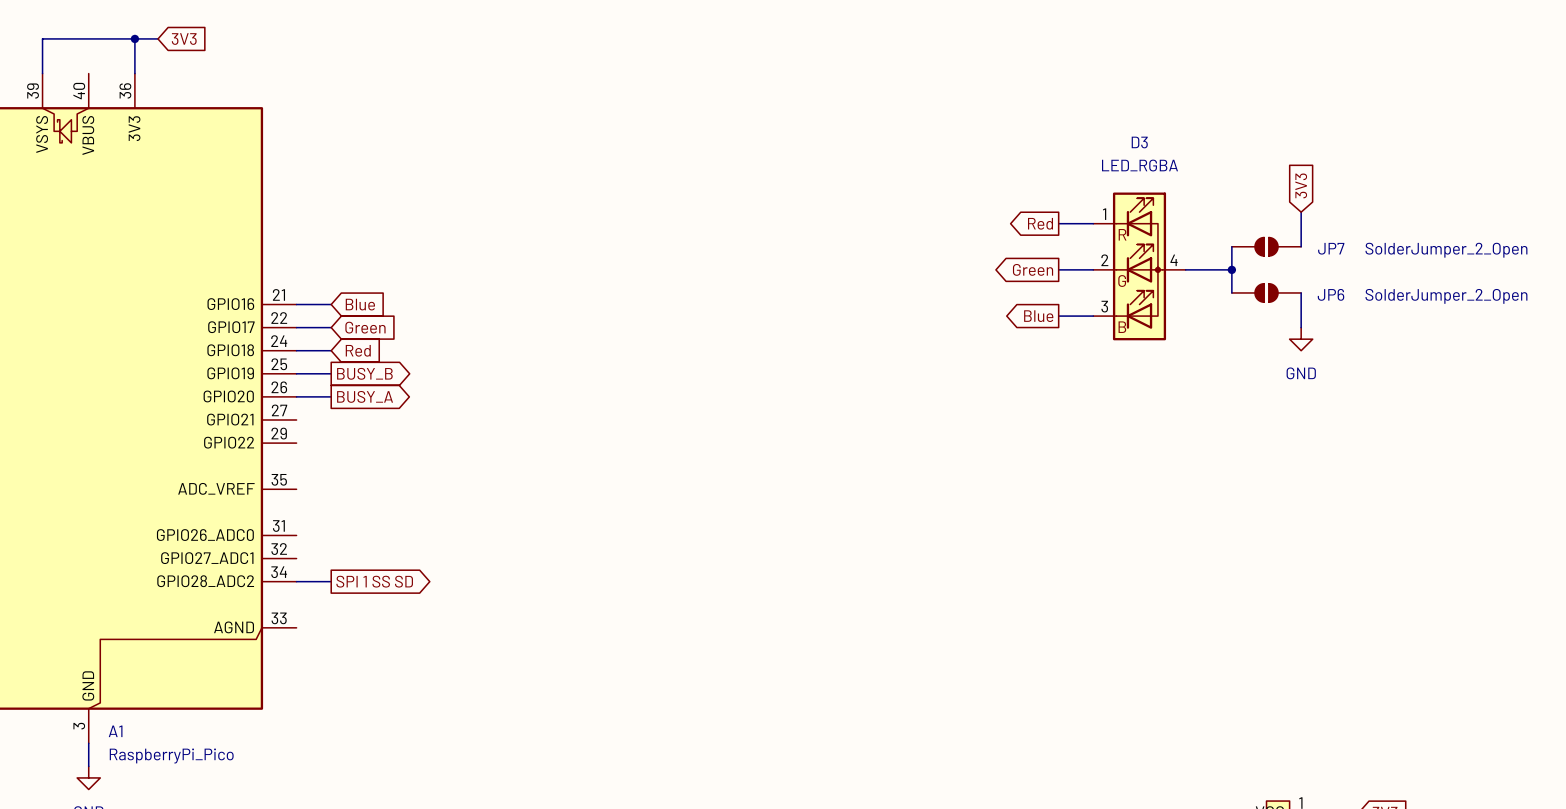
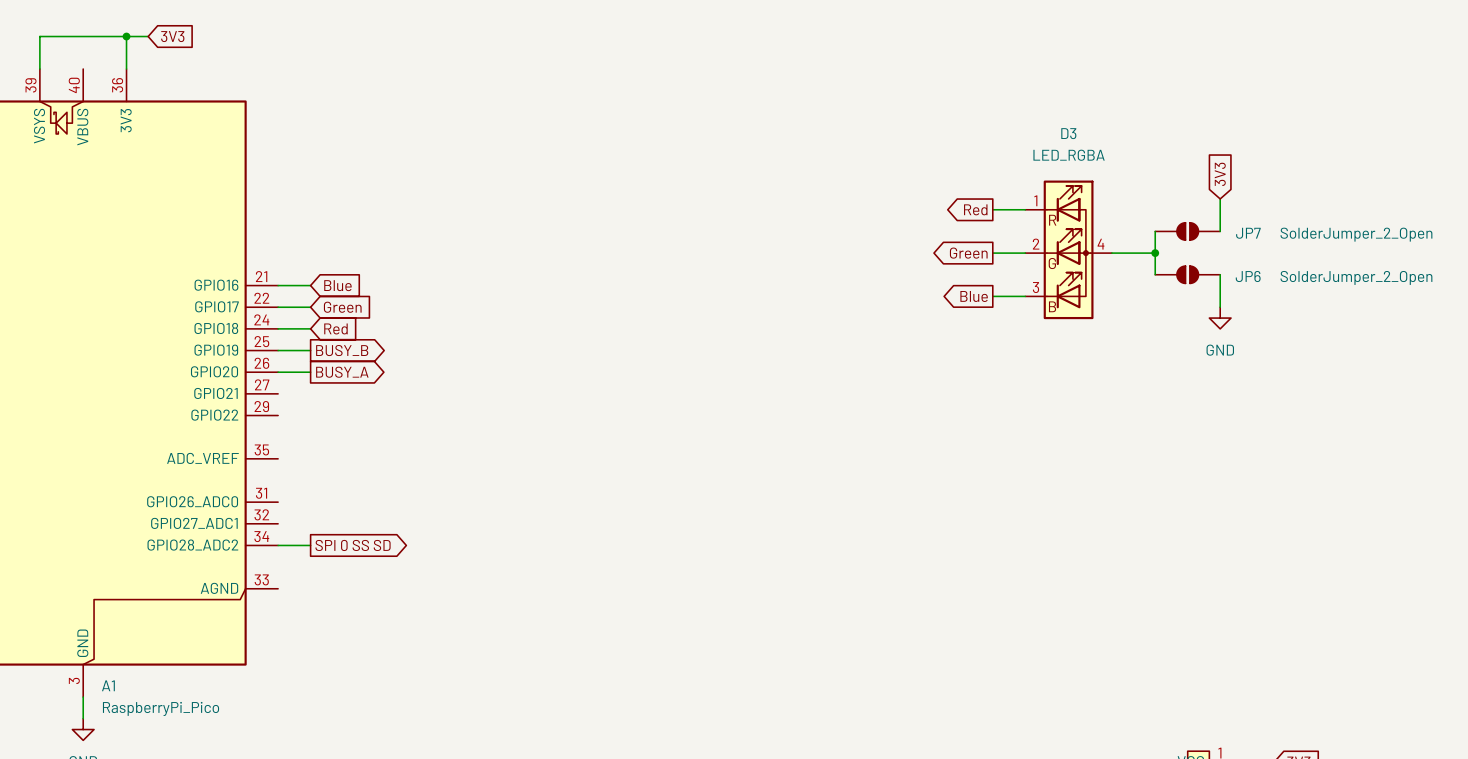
global label: SPI 1 SS SD (374, 581) -> SPI 0 SS SD (353, 545)

